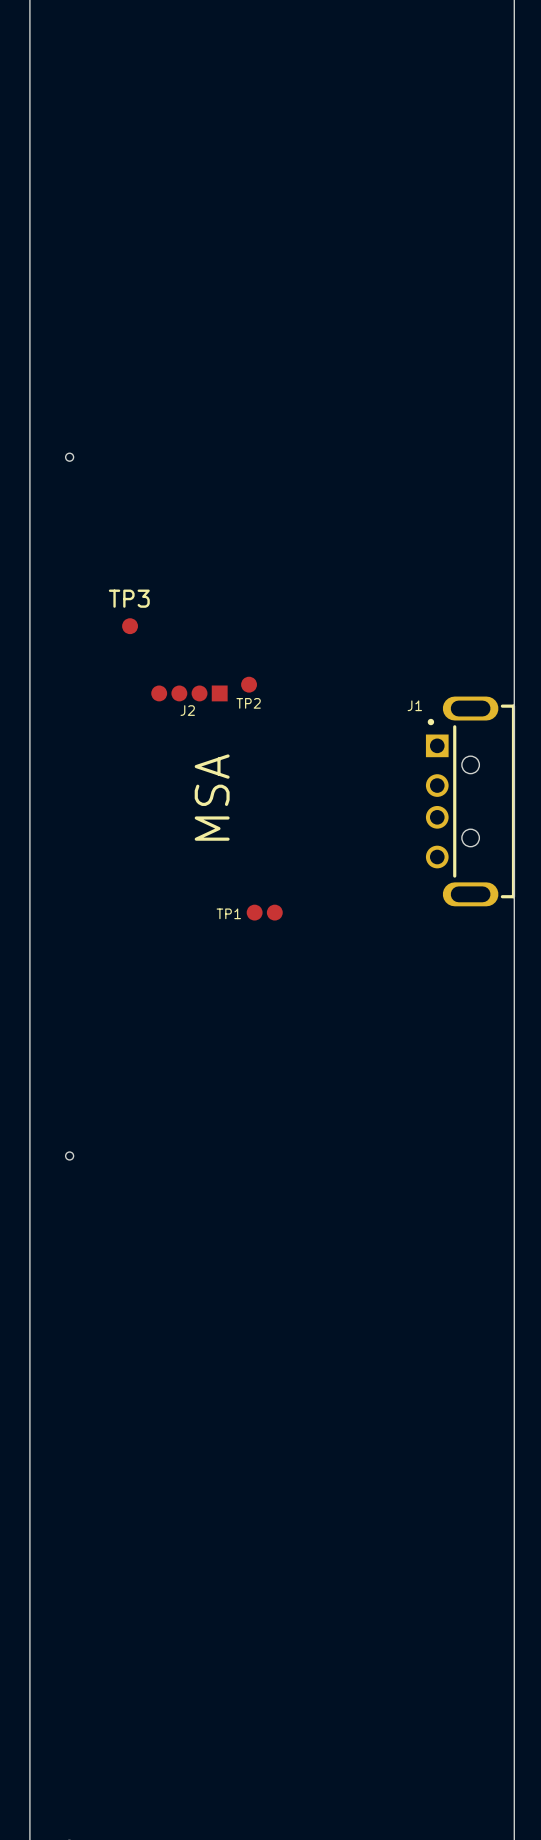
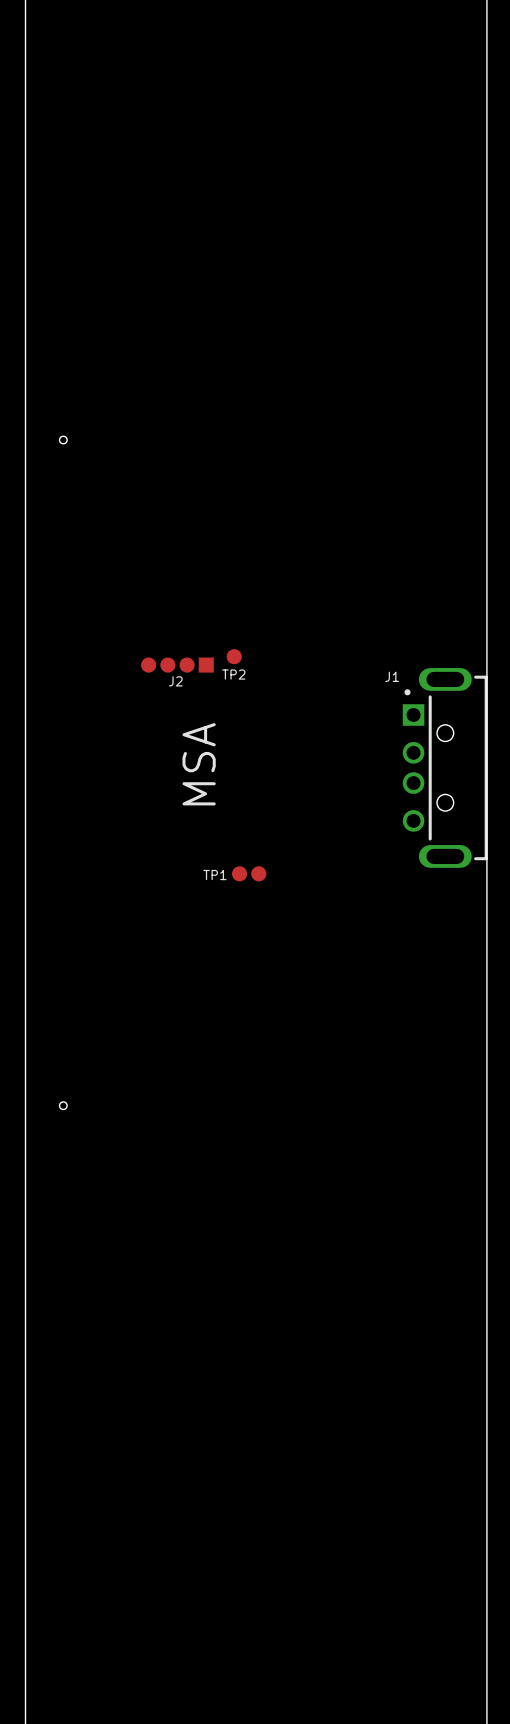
TP3: (130, 626) -> none

